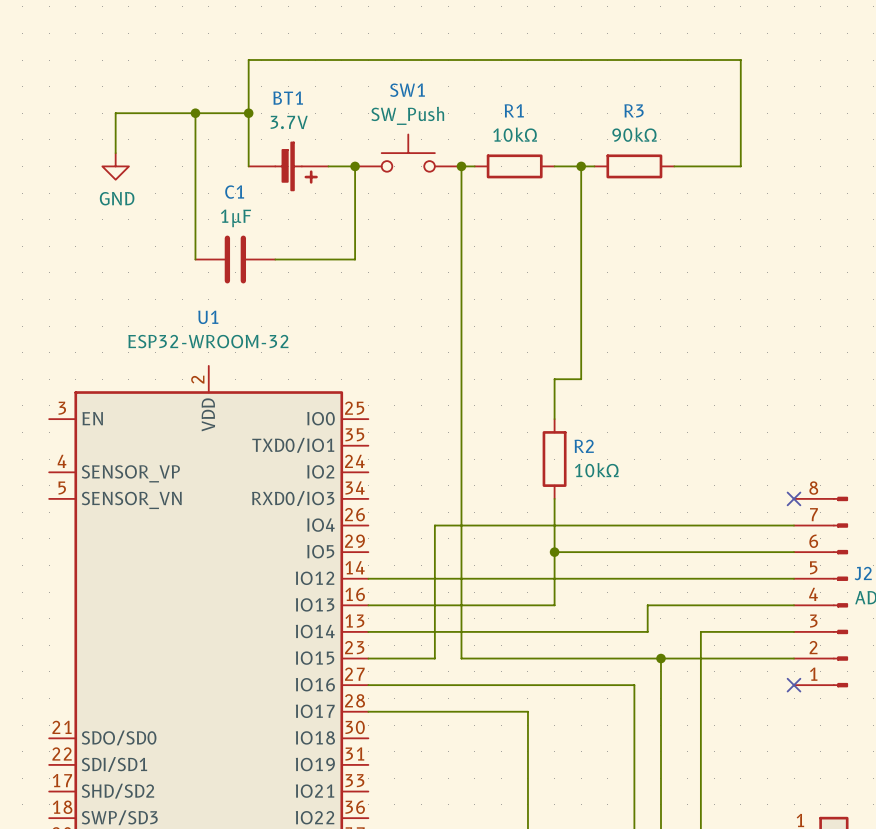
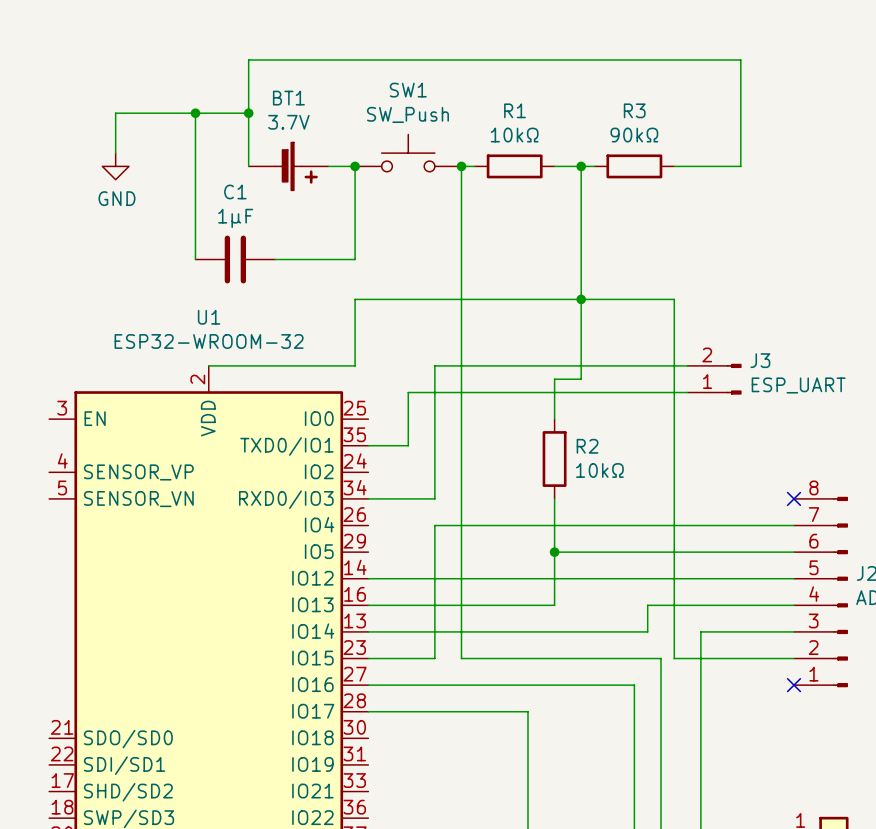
junction: none -> (581, 299)
wire: none -> (687, 365) (434, 365) (434, 498) (368, 498)
J3: none -> ESP_UART (714, 379)
wire: none -> (687, 392) (408, 392) (408, 445) (368, 445)
wire: (660, 658) (674, 658) -> (208, 365) (355, 365) (355, 299) (674, 299) (674, 658)
junction: (660, 658) -> none

